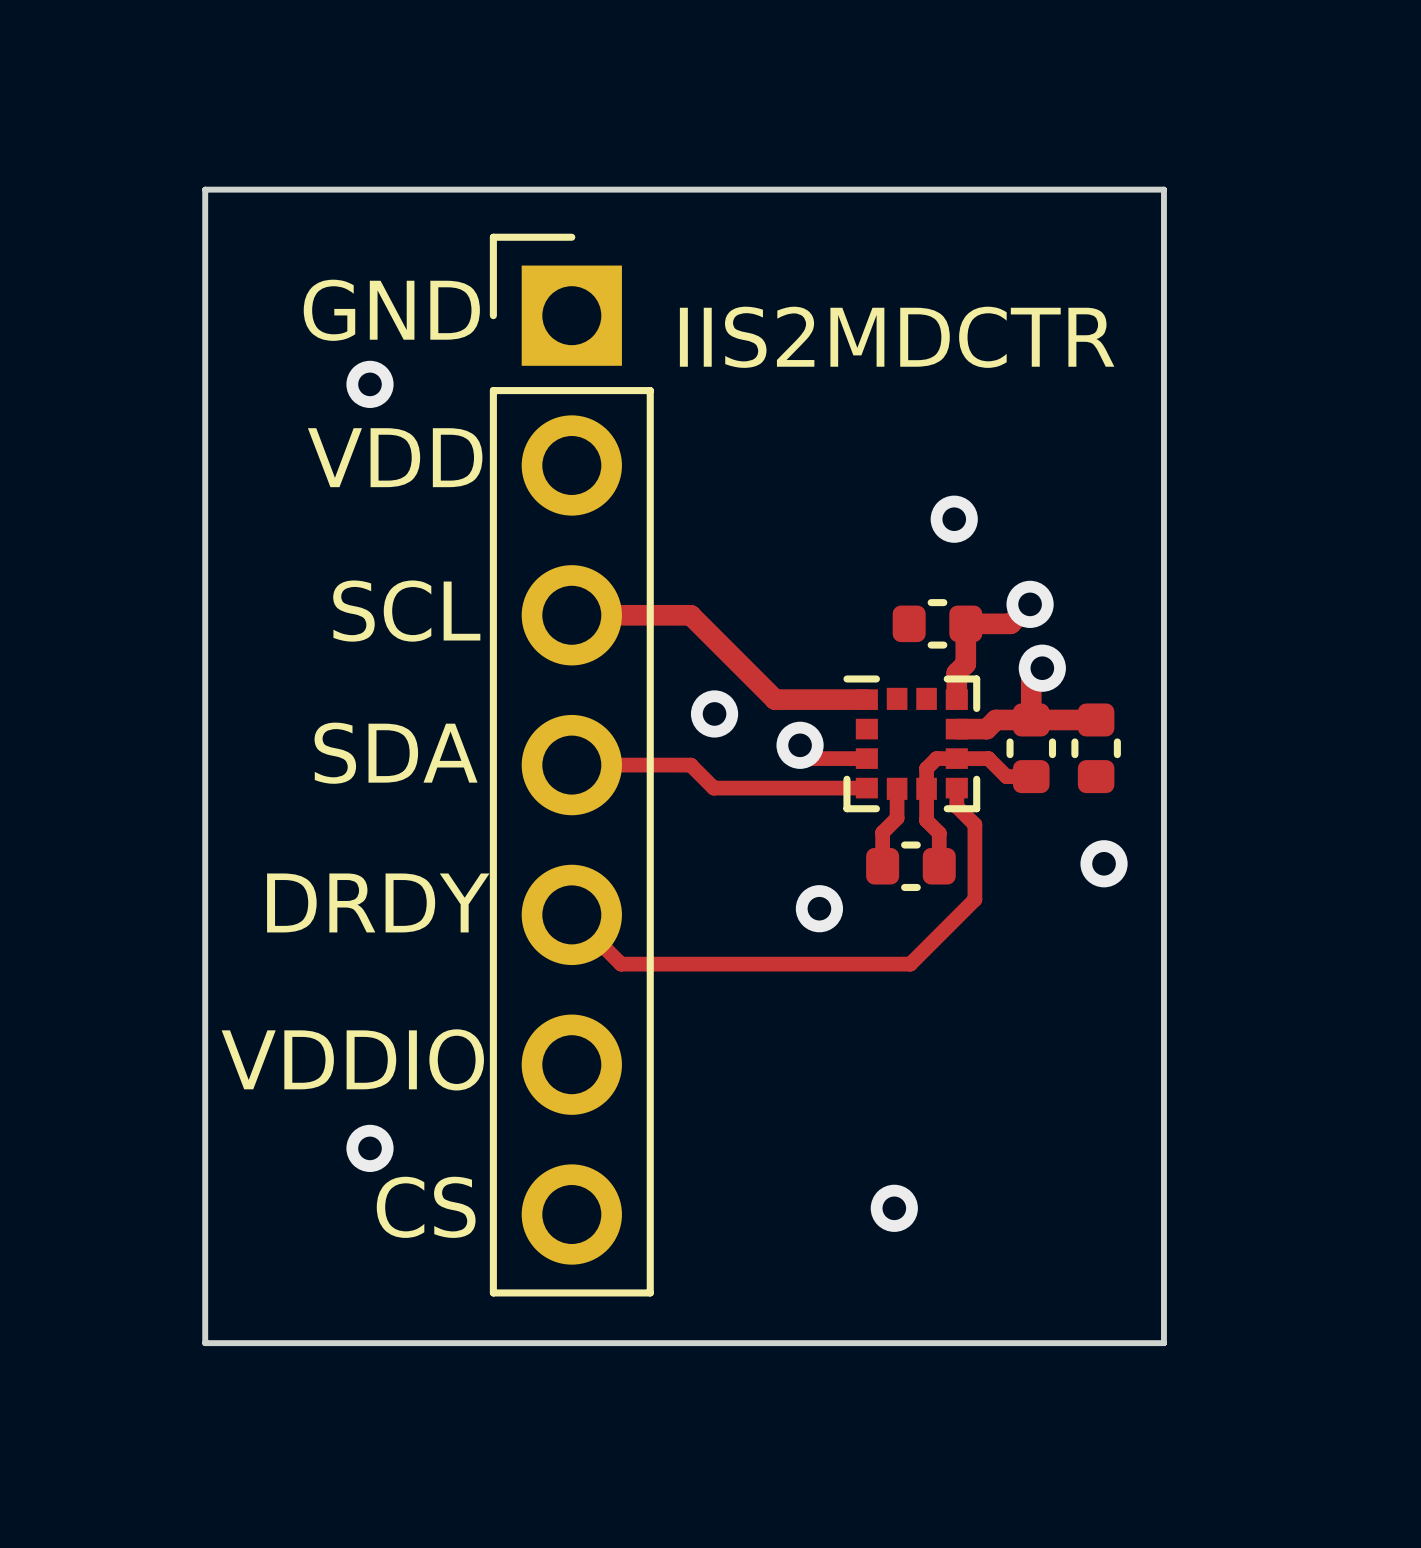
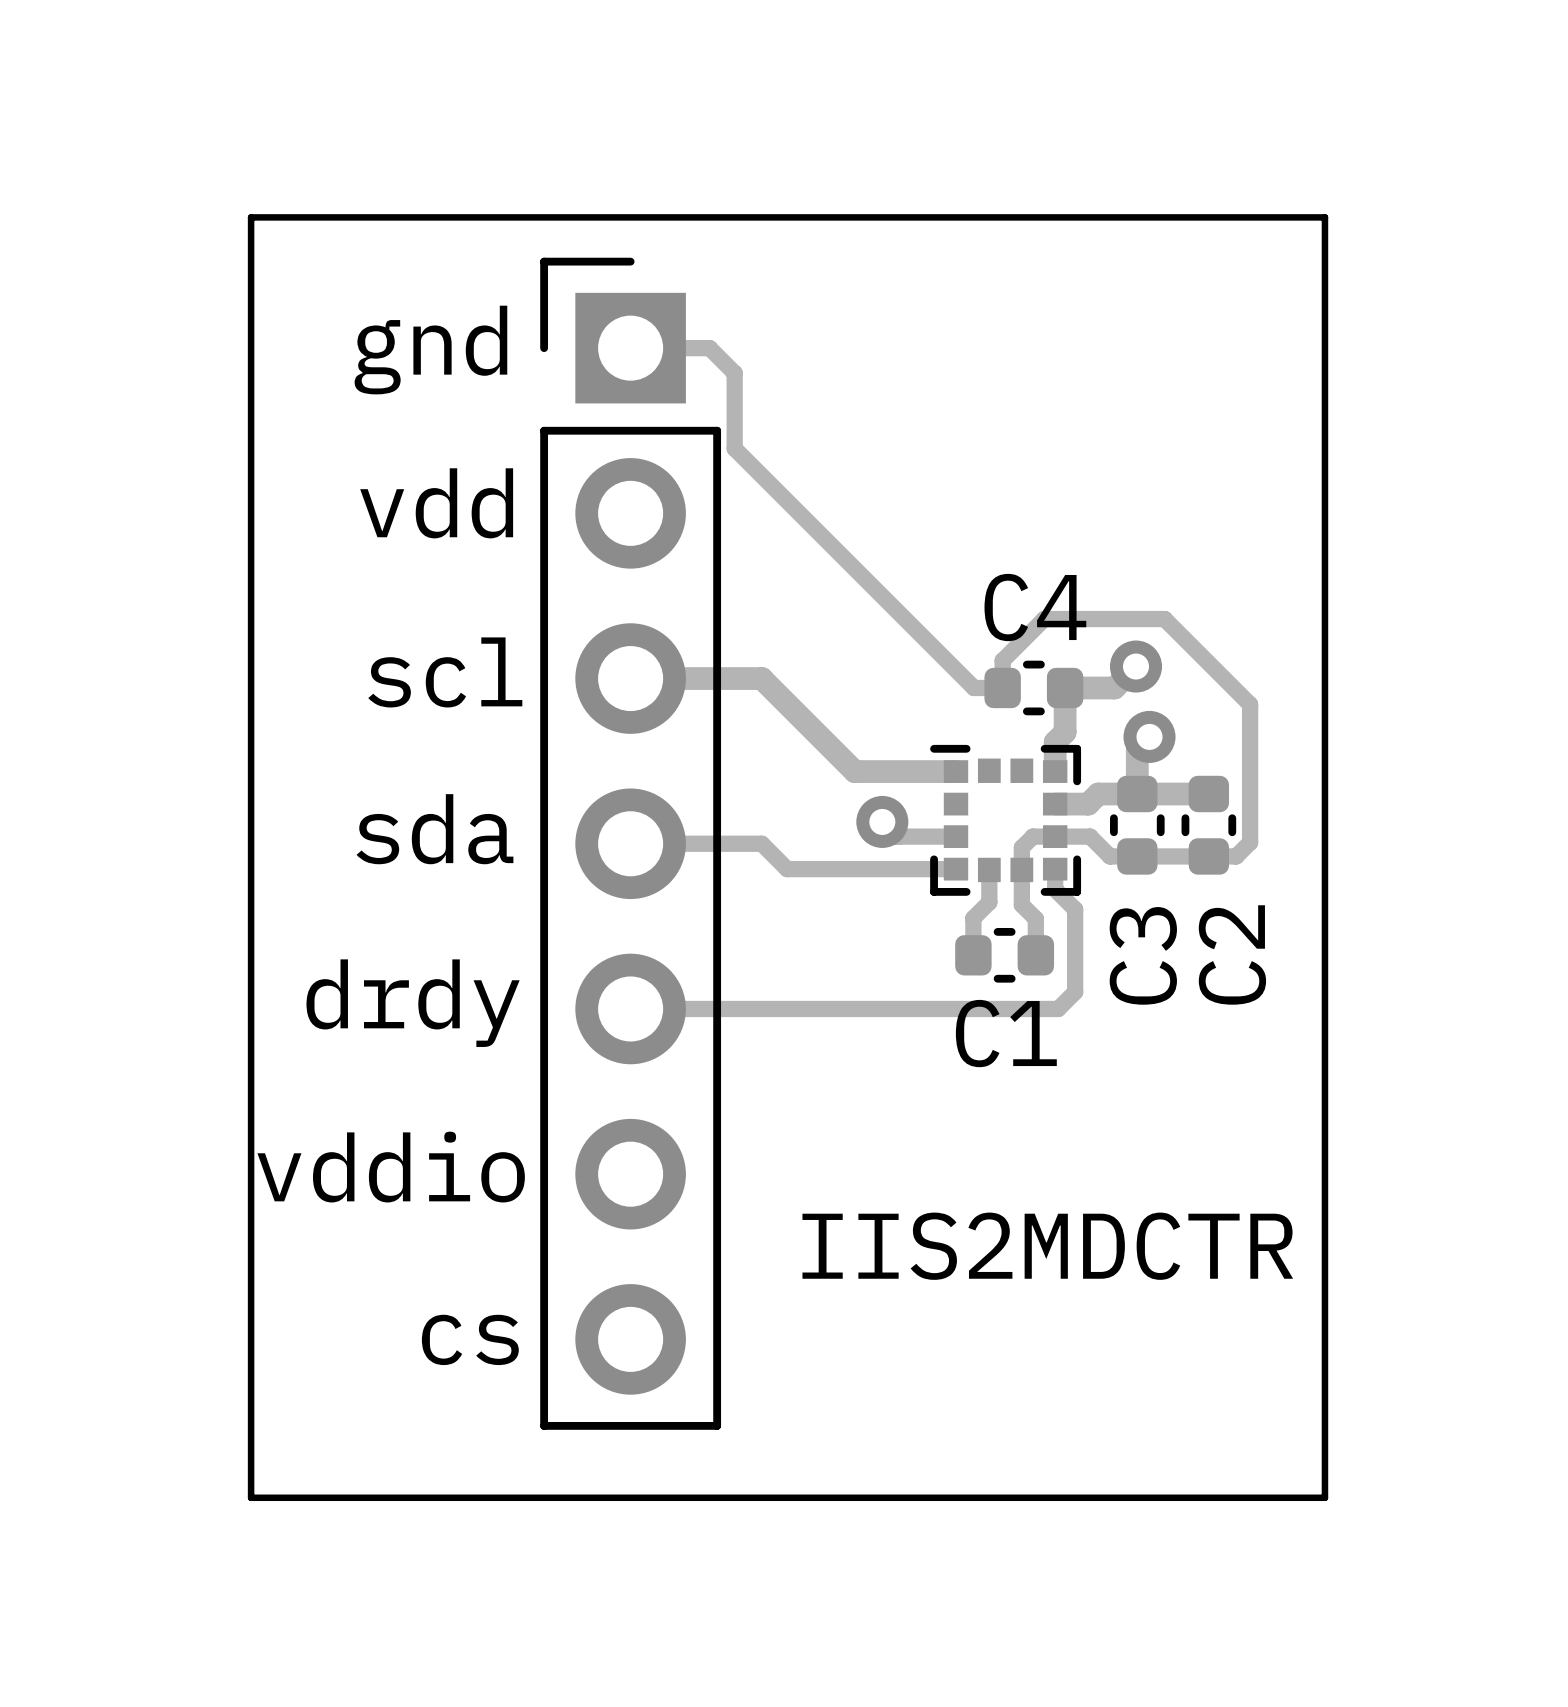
board edge: (205, 189) (1163, 189) (1163, 1343) (205, 1343) (205, 189) -> (251, 217) (251, 1497) (1324, 1497) (1324, 217) (251, 217)
text: GND (391, 310) -> gnd (430, 350)
track: none -> (630, 348) (709, 348) (734, 373) (734, 448) (974, 687) (1002, 687) (1002, 660) (1044, 619) (1164, 619) (1250, 704) (1250, 842) (1236, 856) (1137, 856)
part value position: IIS2MDCTR (897, 337) -> IIS2MDCTR (1047, 1246)
via: (369, 384) -> none
text: VDD (395, 457) -> vdd (436, 503)
via: (954, 519) -> none
C4 name: none -> C4 (1035, 607)
text: SCL (406, 611) -> scl (445, 672)
via: (714, 713) -> none
text: SDA (396, 753) -> sda (434, 829)
via: (1104, 863) -> none
C3 name: none -> C3 (1143, 955)
C2 name: none -> C2 (1232, 954)
text: DRDY (378, 902) -> drdy (413, 1003)
via: (819, 908) -> none
track: (571, 914) (621, 964) (910, 964) (959, 914) -> (630, 1008) (1058, 1008)
C1 name: none -> C1 (1006, 1033)
text: VDDIO (352, 1059) -> vddio (391, 1167)
via: (369, 1148) -> none
text: CS (426, 1207) -> cs (470, 1339)
via: (894, 1208) -> none

